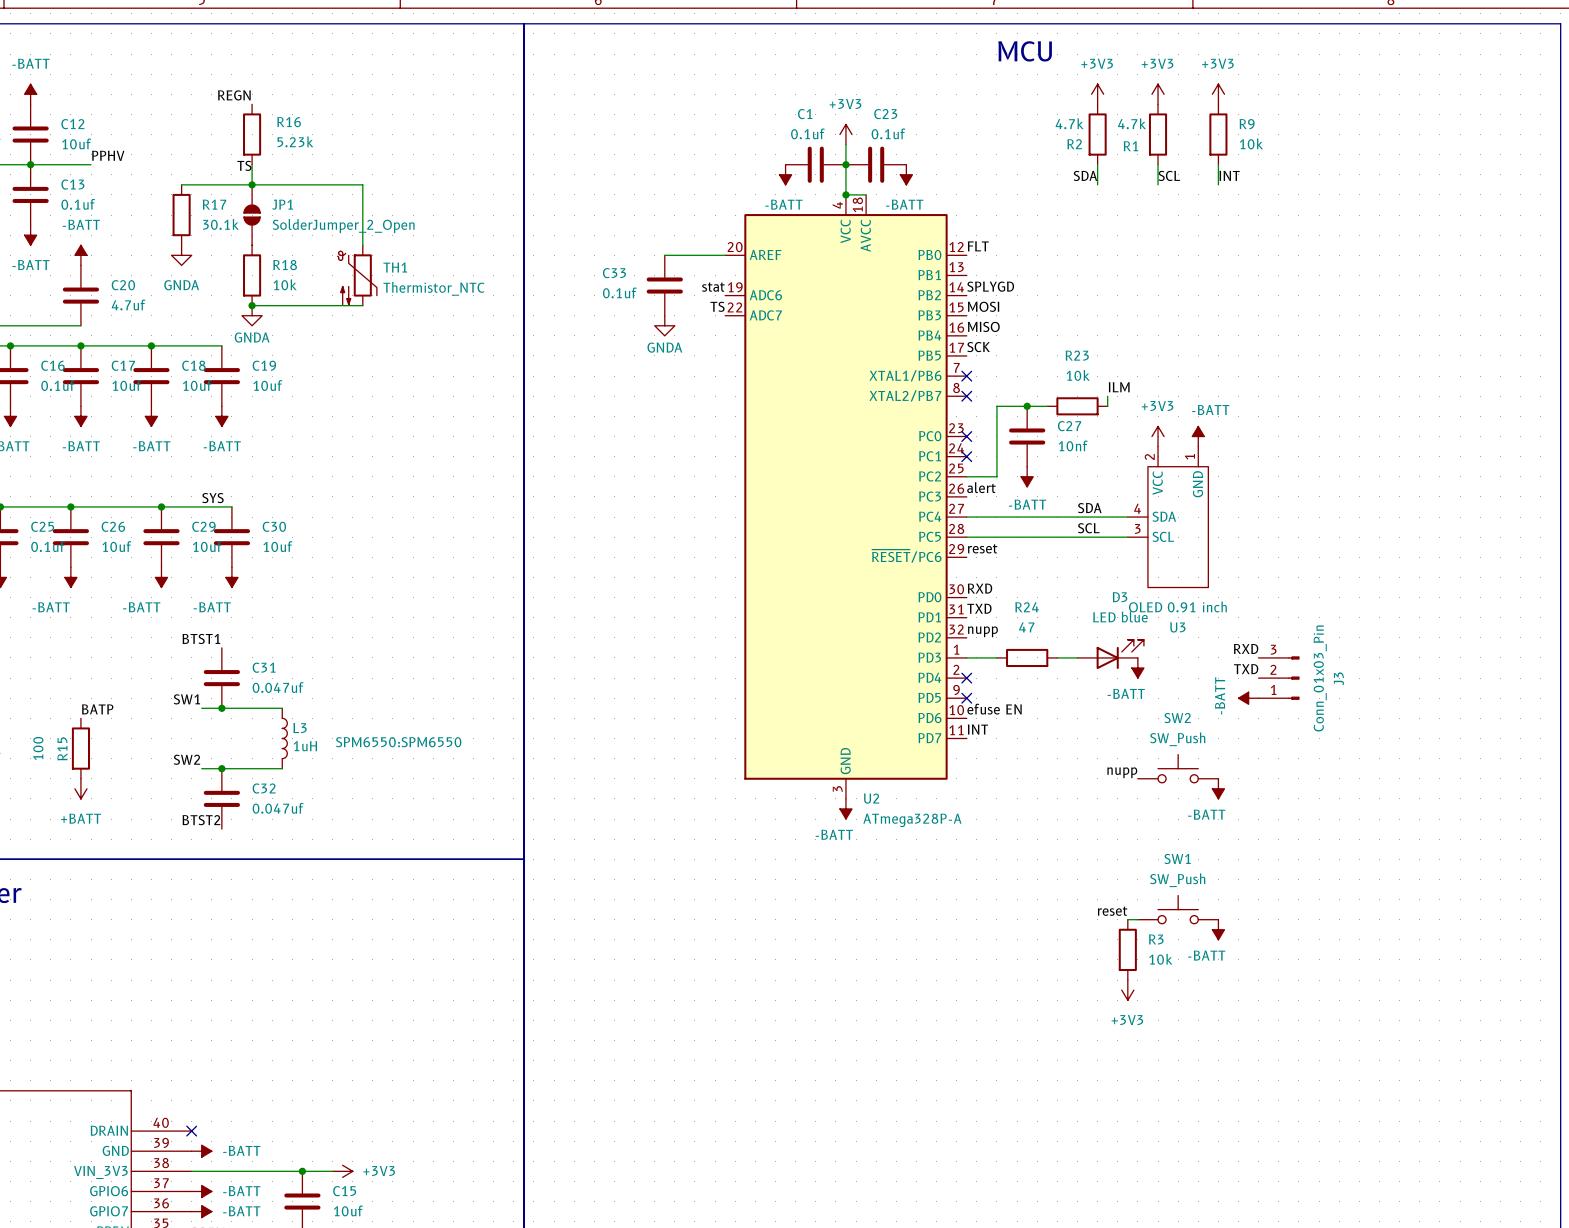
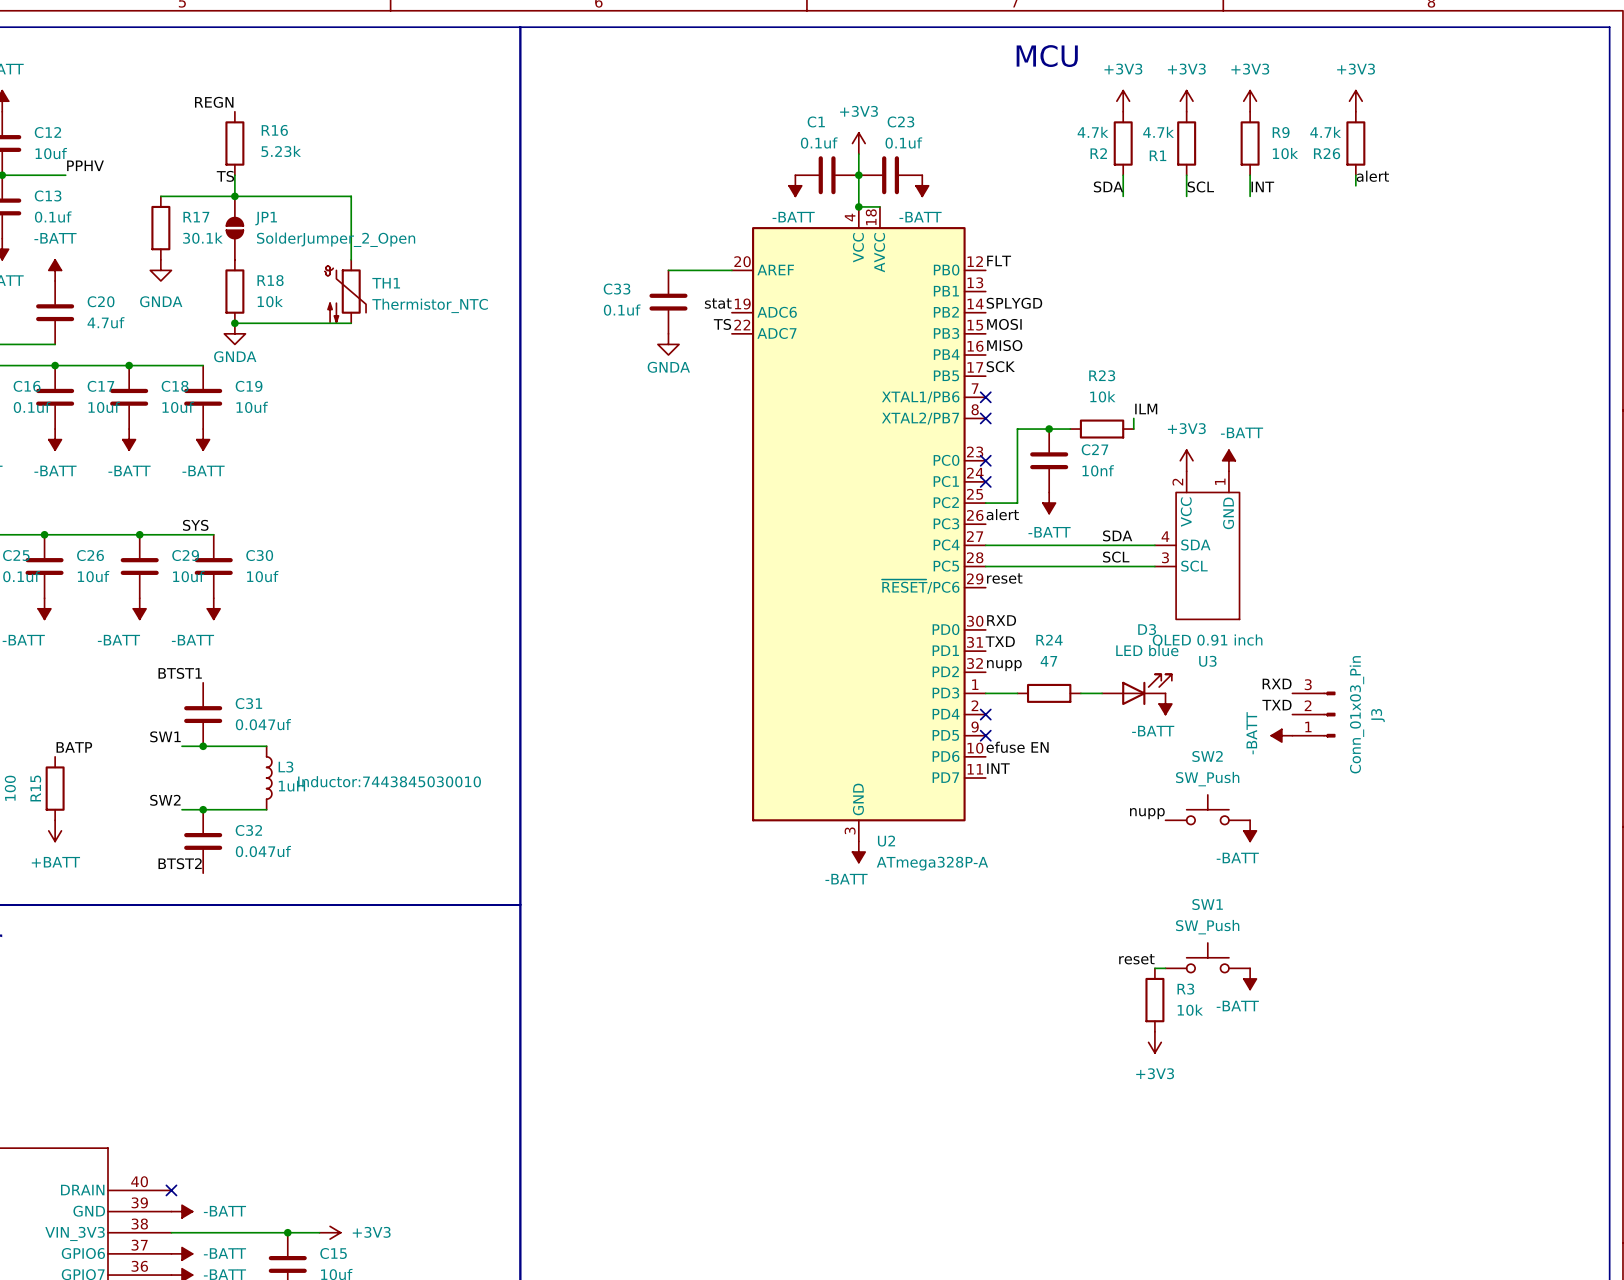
power symbol: none -> +3V3 (1355, 101)
R26: none -> 4.7k (1355, 143)
wire: none -> (1355, 175) (1355, 185)
label: none -> alert (1372, 176)
L3 text: SPM6550:SPM6550 (398, 742) -> Inductor:7443845030010 (389, 781)

